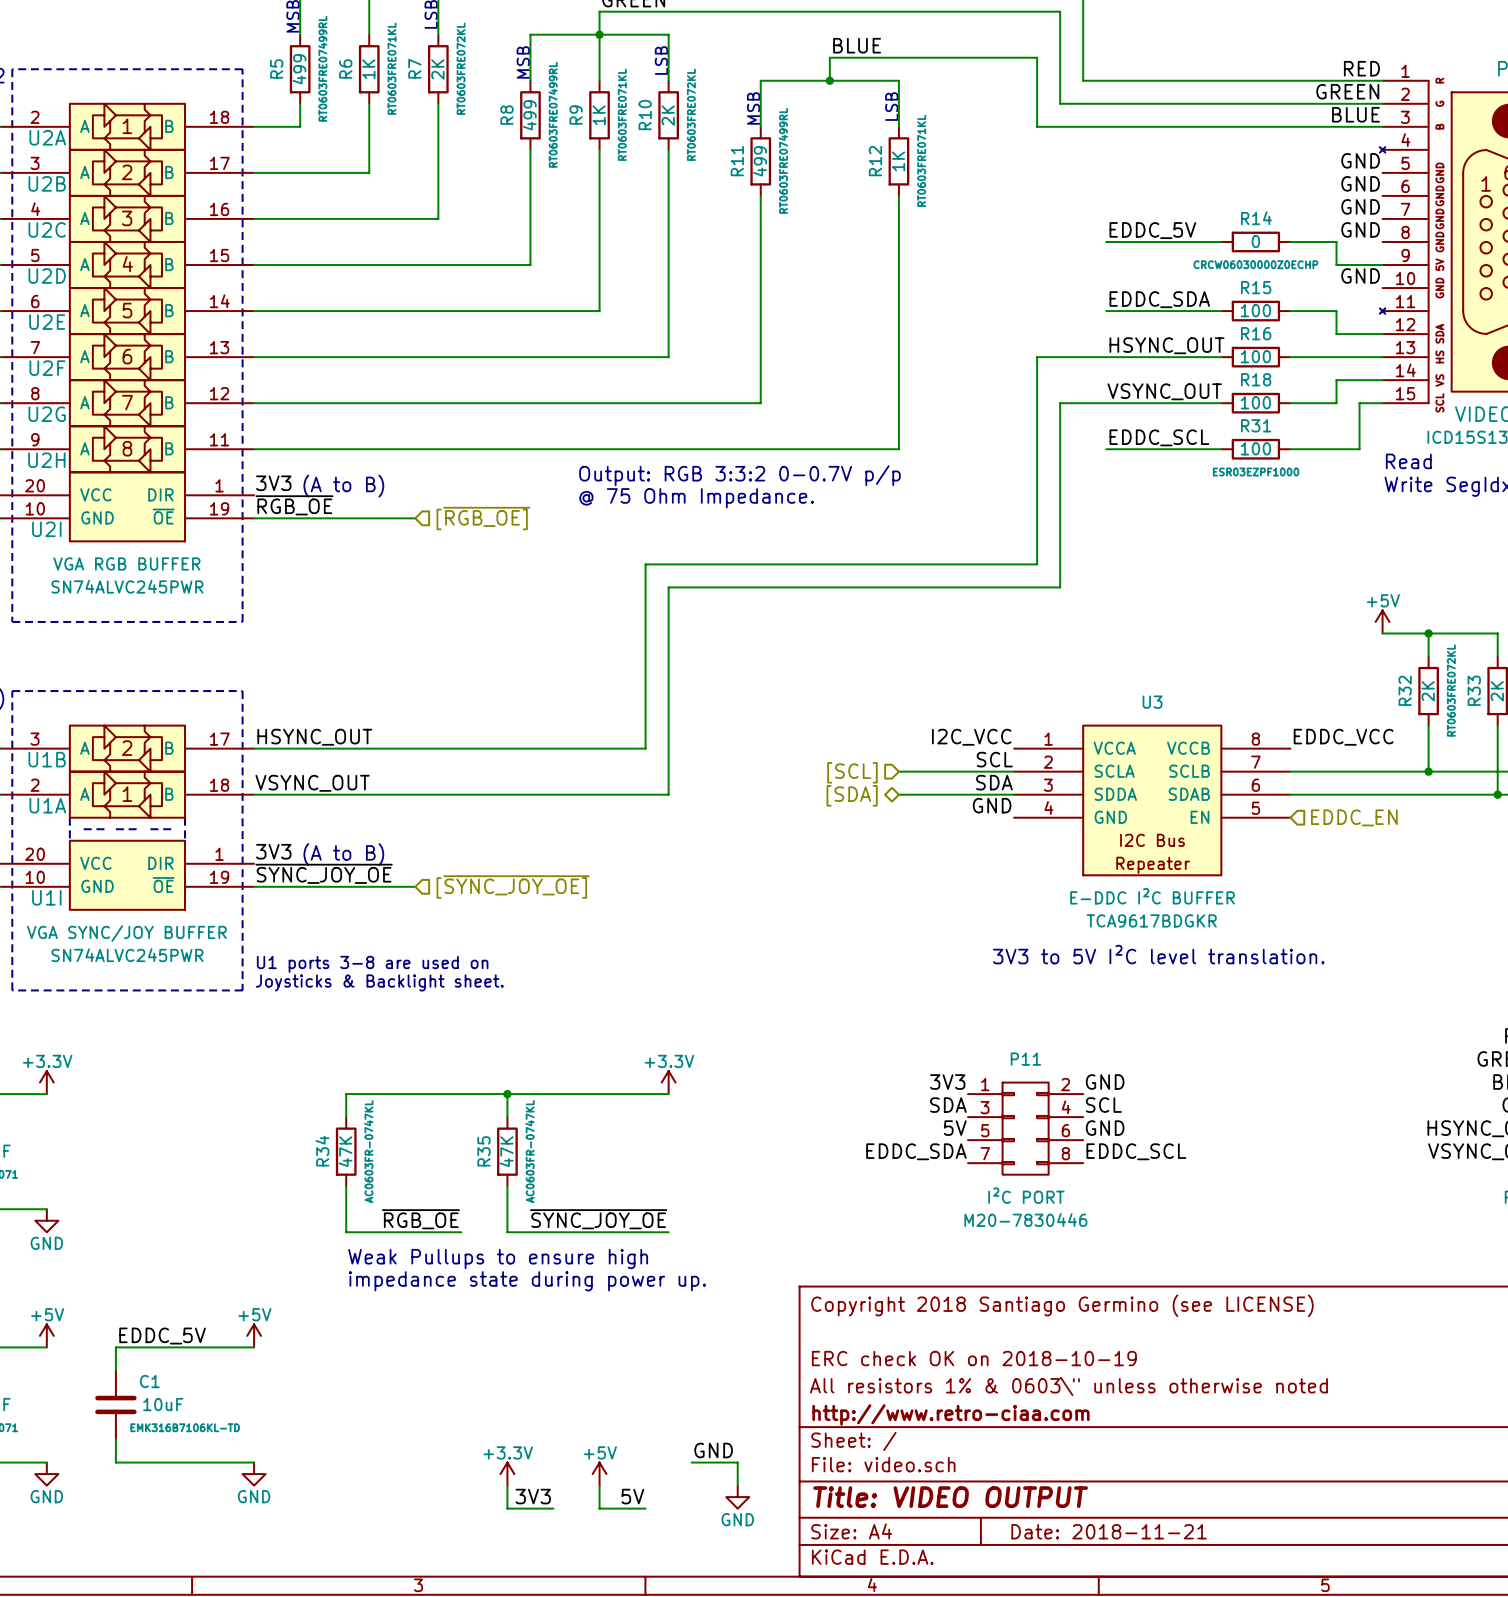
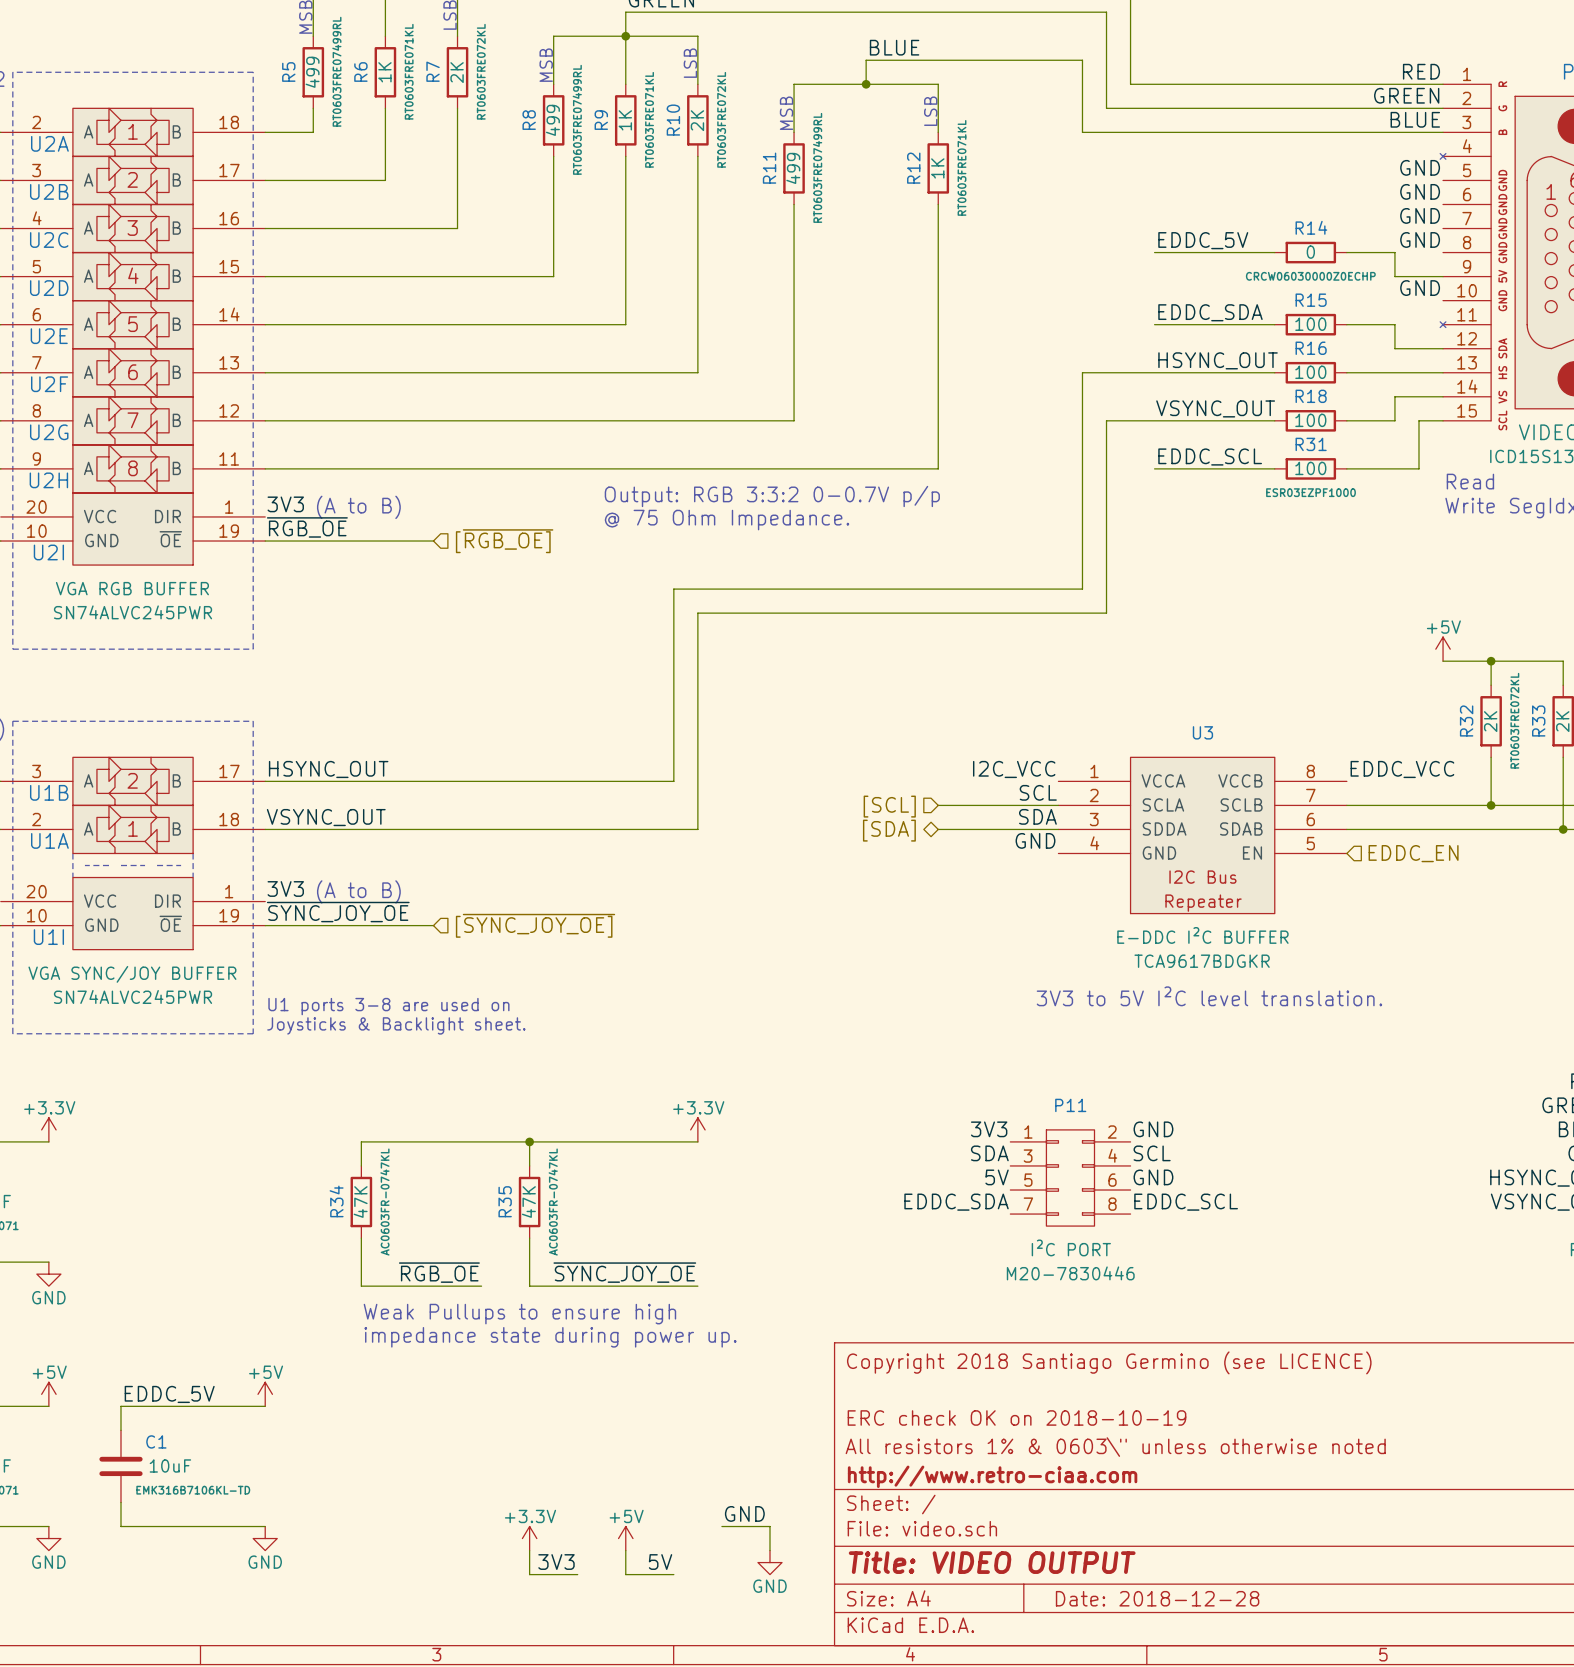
title block: Copyright 2018 Santiago Germino (see LICENSE) (1062, 1305) -> Copyright 2018 Santiago Germino (see LICENCE) (1109, 1362)
title block: Date: 2018-11-21 (1109, 1531) -> Date: 2018-12-28 (1157, 1598)

